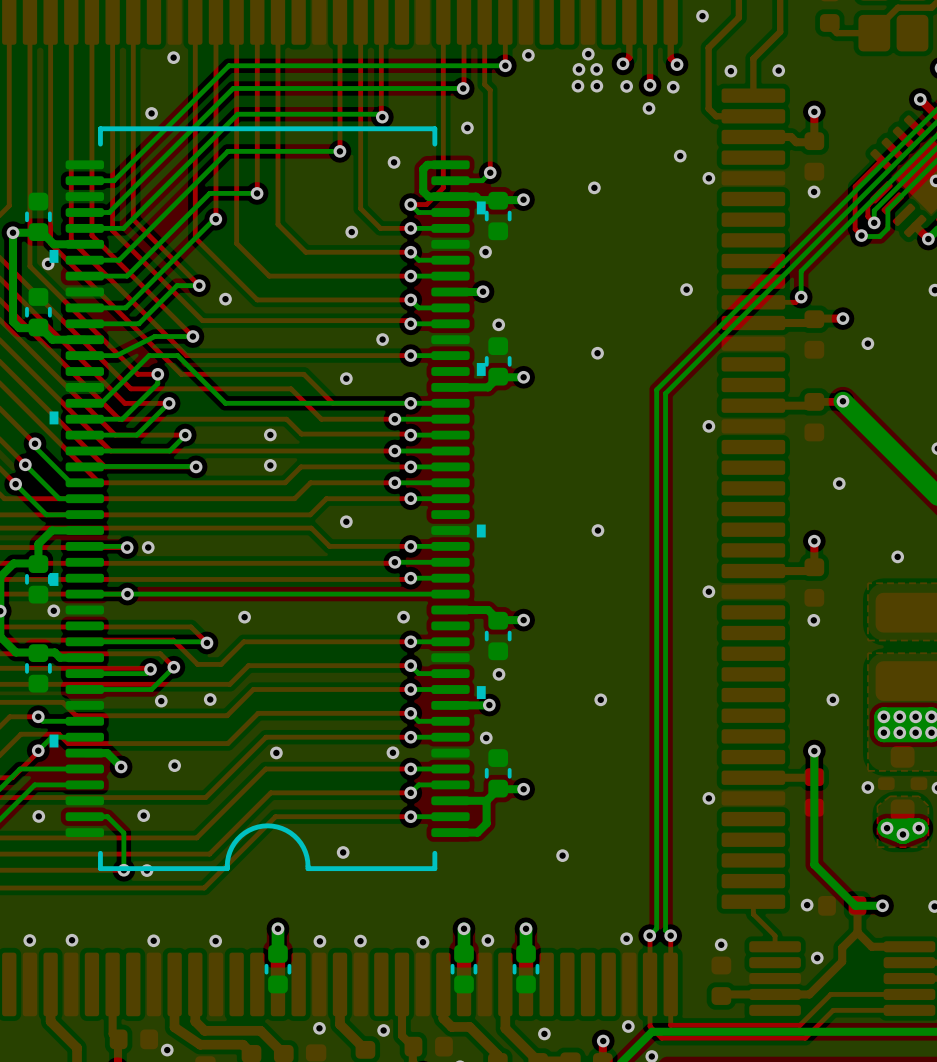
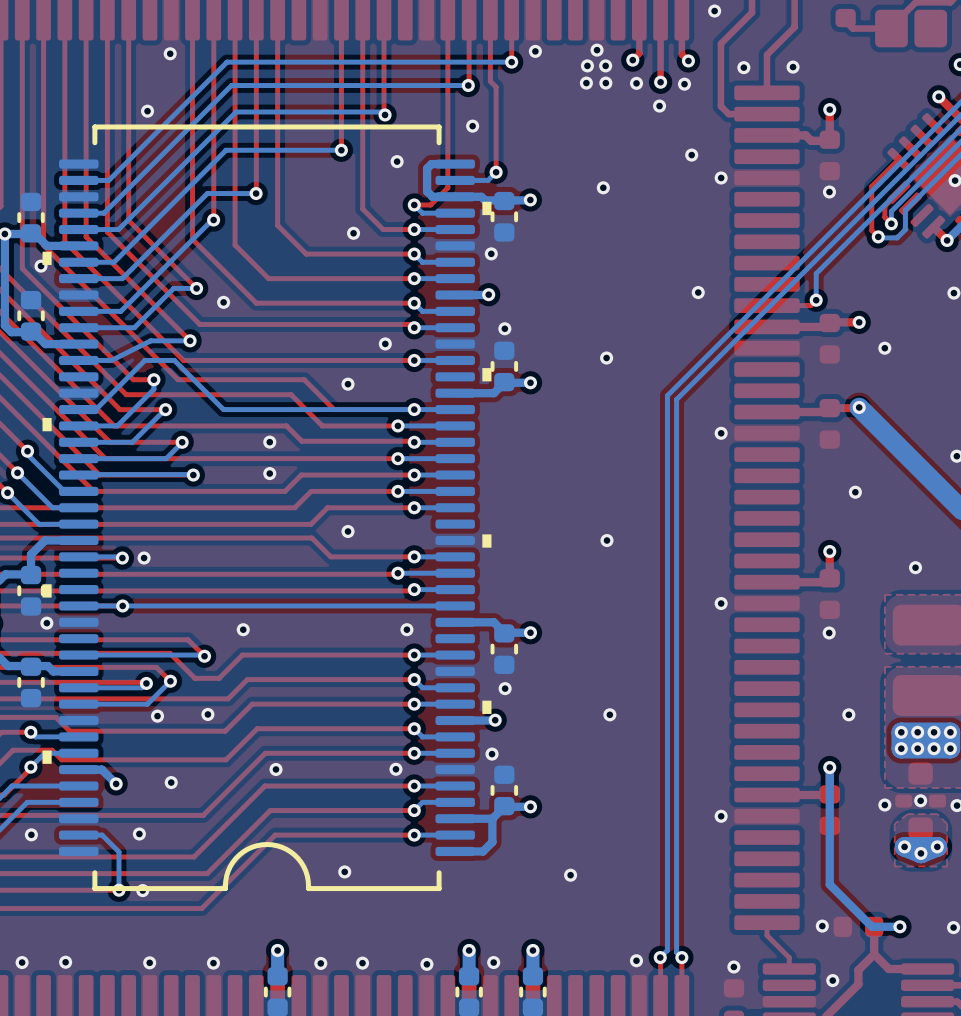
via: none -> (920, 800)

